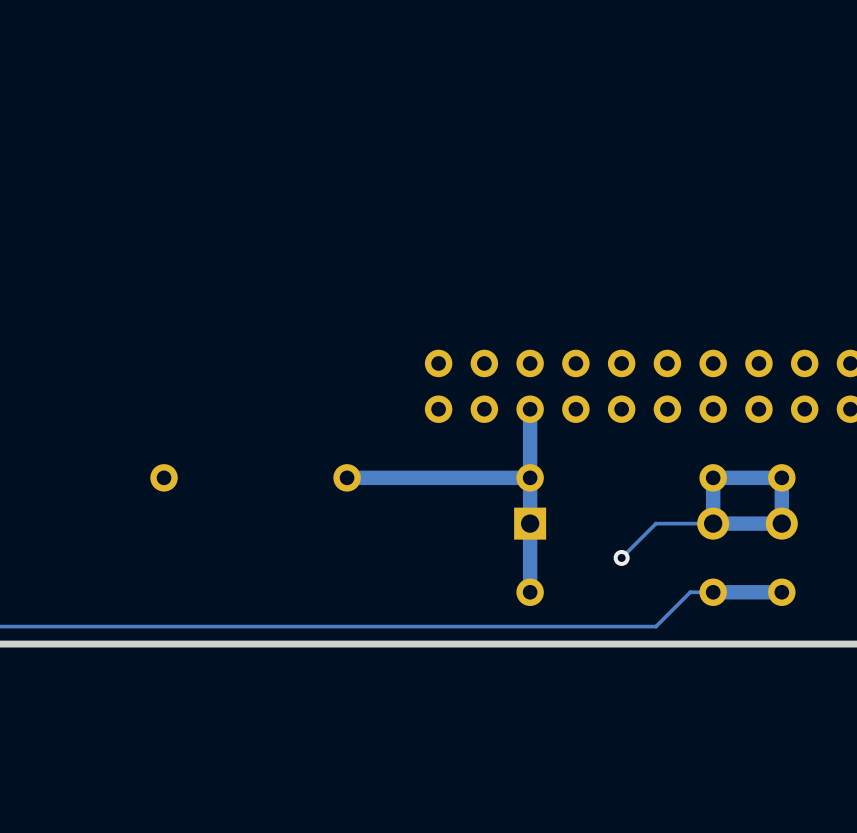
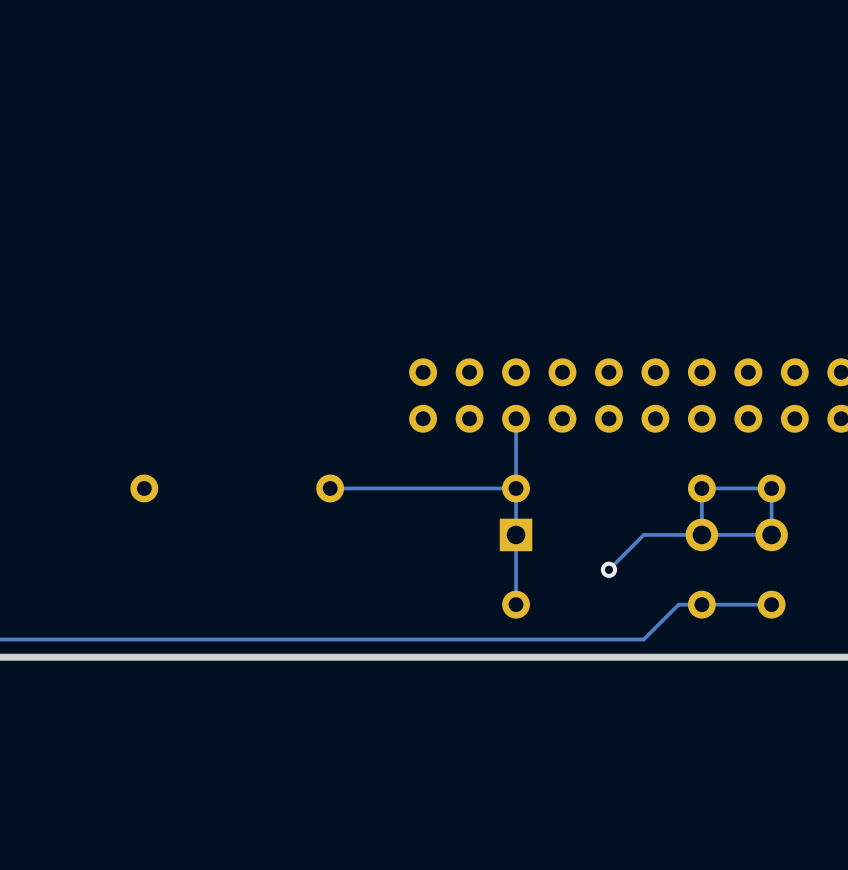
track width: thick (530, 409) (530, 592) -> thin (516, 418) (516, 604)
track width: thick (530, 477) (347, 477) -> thin (516, 488) (330, 488)
track width: thick (781, 477) (713, 477) (713, 523) (781, 523) (781, 477) -> thin (771, 488) (701, 488) (701, 534) (771, 534) (771, 488)
track width: thick (781, 592) (713, 592) -> thin (771, 604) (701, 604)

